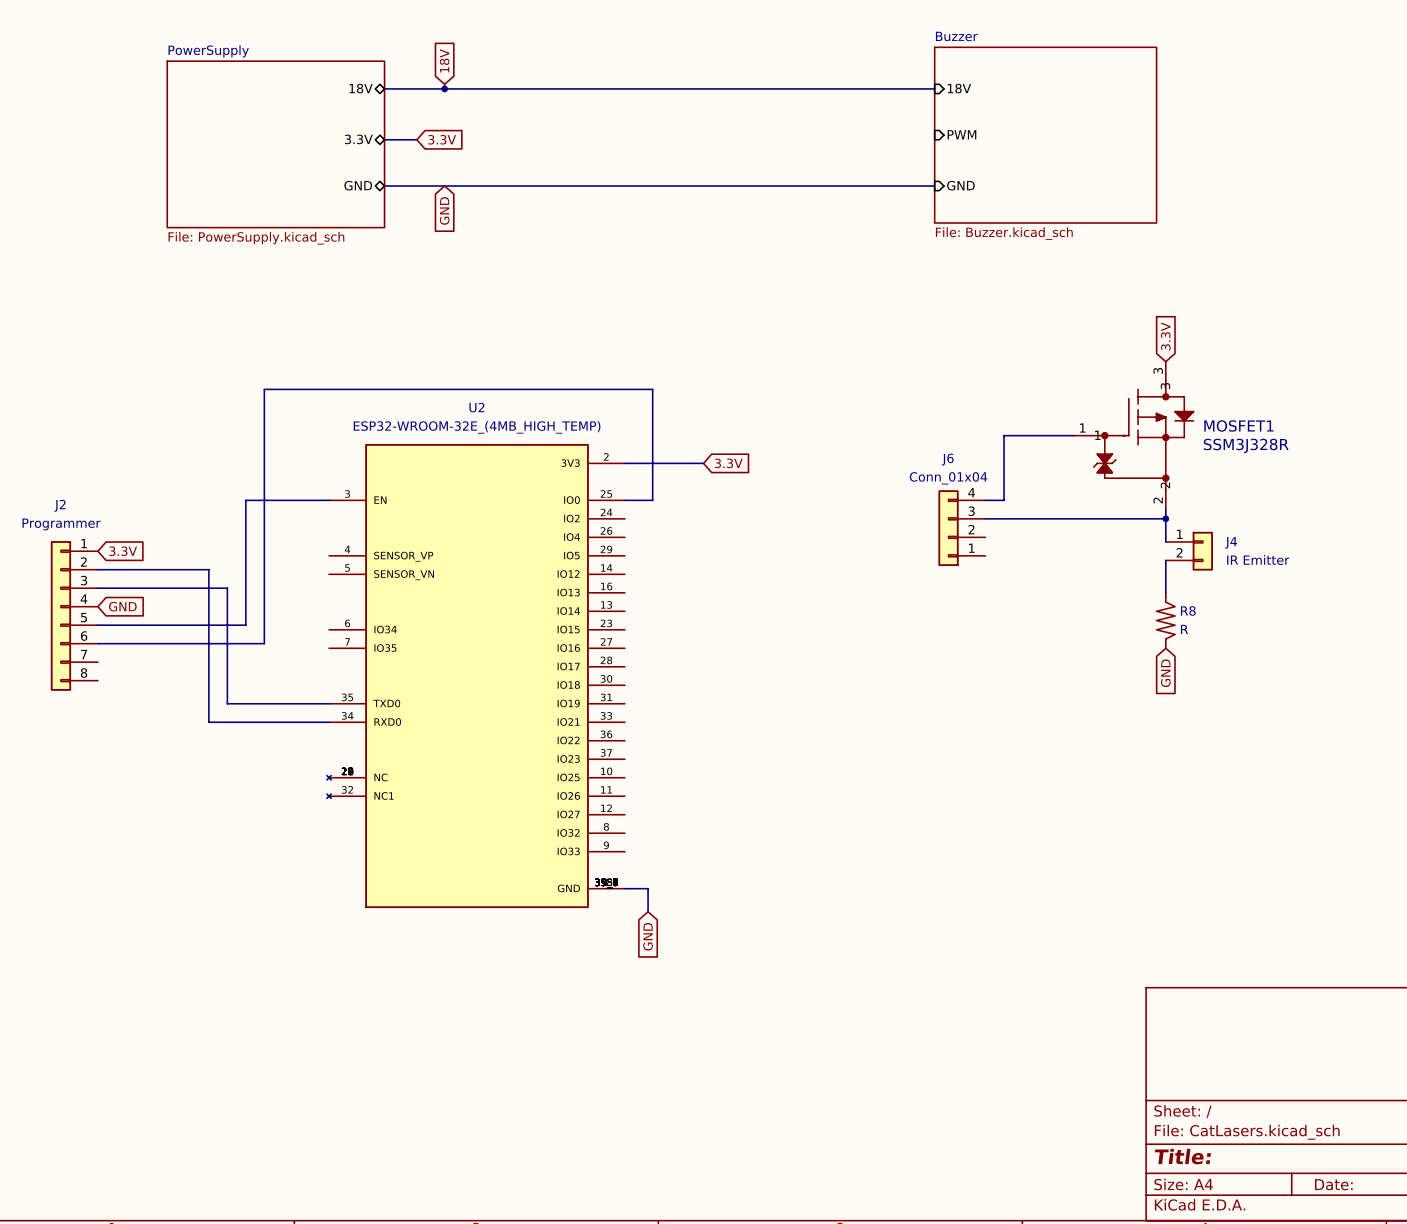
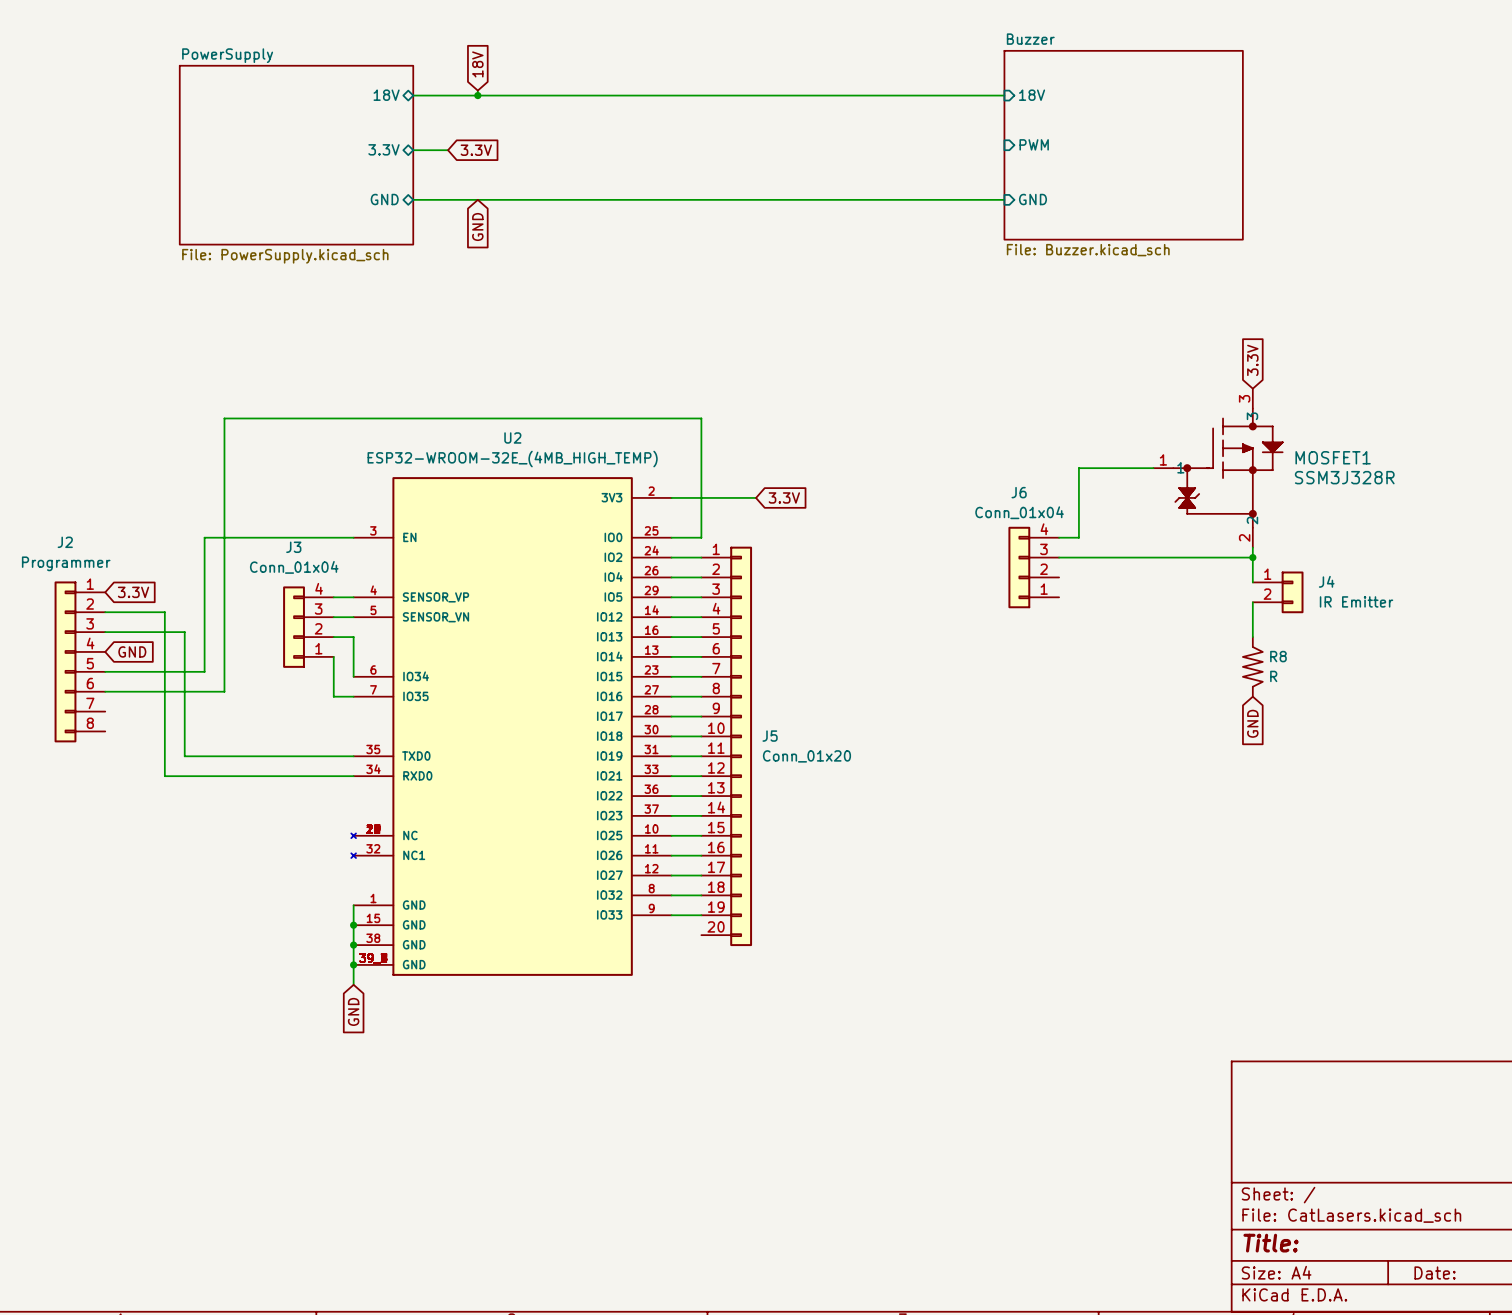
wire: (264, 389) (264, 643) (208, 643) (208, 722) -> (284, 418) (224, 418) (224, 612)
U2 symbol: [326, 443, 625, 909] -> [351, 477, 672, 976]
wire: (245, 500) (245, 625) (190, 625) -> (264, 537) (204, 537) (204, 671)
wire: none -> (671, 557) (701, 557)
wire: none -> (671, 577) (701, 577)
wire: none -> (333, 597) (353, 597)
wire: none -> (671, 597) (701, 597)
wire: (153, 569) (208, 569) -> (164, 612) (164, 776) (224, 776)
wire: none -> (333, 617) (353, 617)
wire: none -> (671, 617) (701, 617)
J3: none -> Conn_01x04 (308, 627)
wire: (171, 588) (227, 588) (227, 703) -> (184, 632) (184, 756) (244, 756)
wire: none -> (333, 637) (353, 637) (353, 676)
wire: none -> (671, 637) (701, 637)
wire: none -> (333, 656) (333, 696) (353, 696)
wire: none -> (671, 656) (701, 656)
wire: none -> (671, 676) (701, 676)
wire: none -> (671, 696) (701, 696)
wire: none -> (671, 716) (701, 716)
wire: none -> (671, 736) (701, 736)
J5: none -> Conn_01x20 (726, 746)
wire: none -> (671, 756) (701, 756)
wire: none -> (671, 776) (701, 776)
wire: none -> (671, 796) (701, 796)
wire: none -> (671, 815) (701, 815)
wire: none -> (671, 835) (701, 835)
wire: none -> (671, 855) (701, 855)
wire: none -> (671, 875) (701, 875)
wire: none -> (671, 895) (701, 895)
wire: none -> (353, 905) (353, 984)
wire: none -> (671, 915) (701, 915)
junction: none -> (353, 925)
junction: none -> (353, 945)
wire: (624, 888) (648, 888) (648, 911) -> none
junction: none -> (353, 964)
global label: GND (648, 936) -> none
global label: none -> GND (353, 1011)

